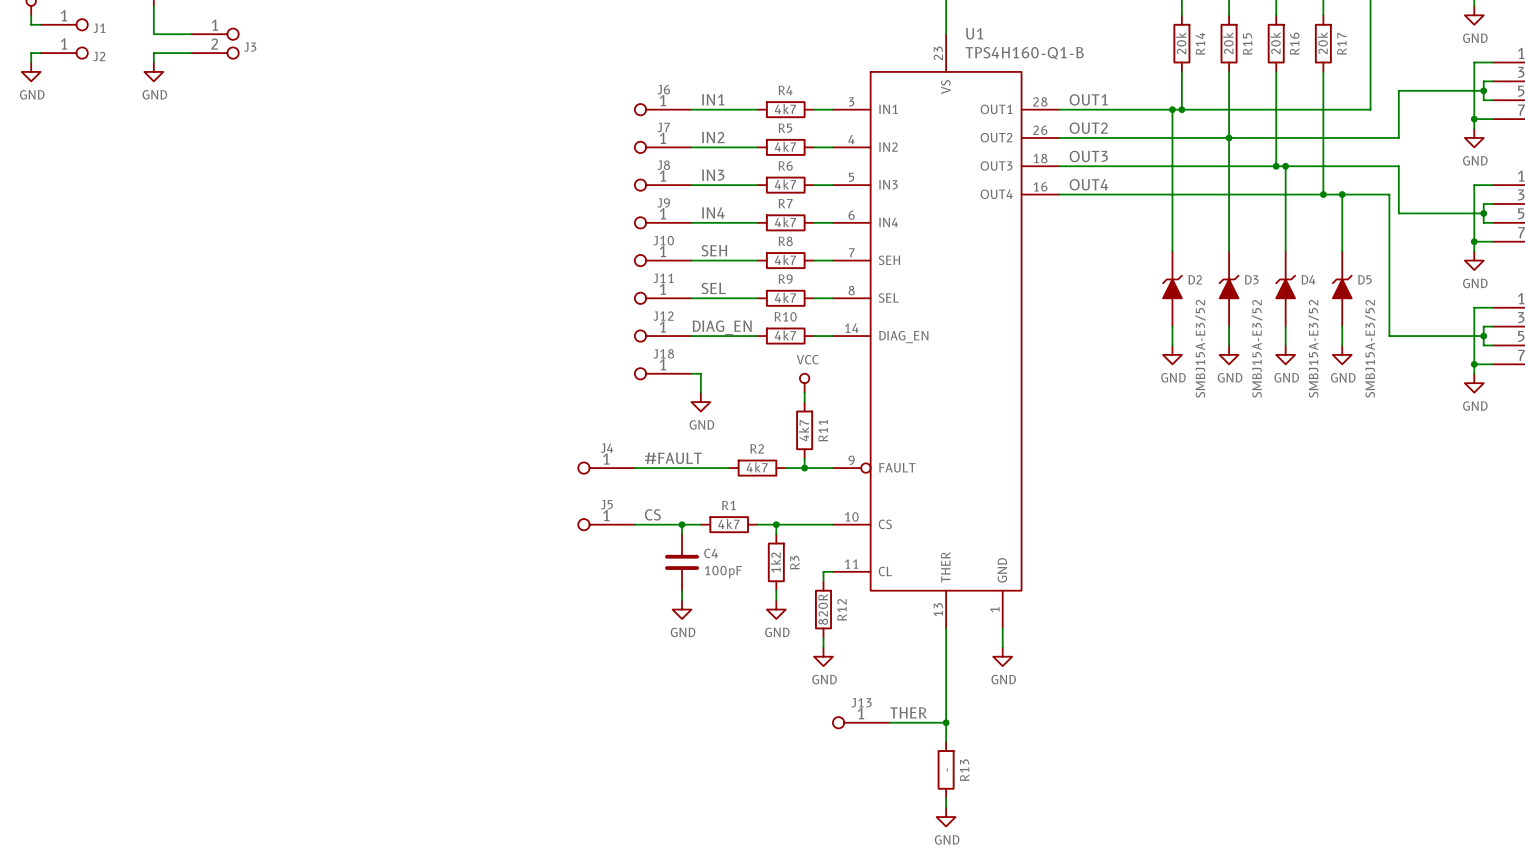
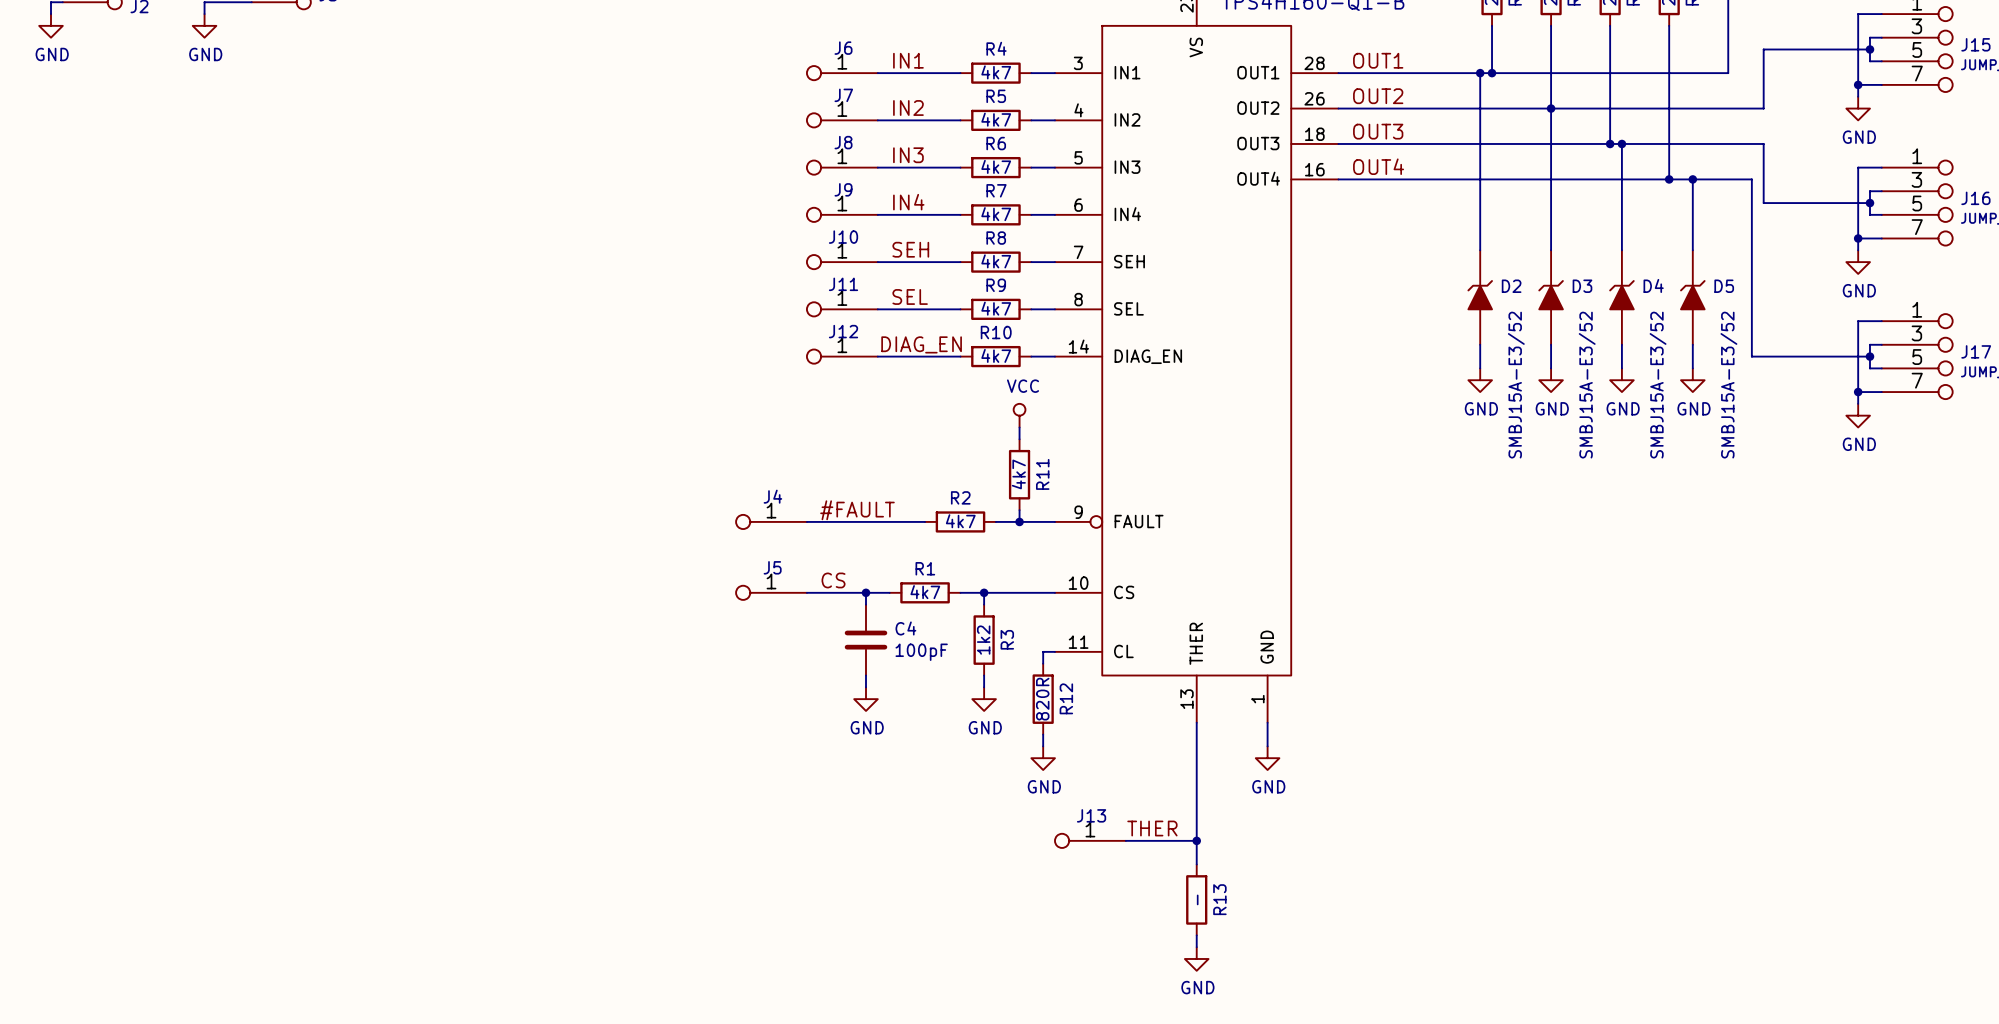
J18: (663, 373) -> none
wire: (691, 373) (700, 373) (700, 392) -> none
power symbol: GND (700, 402) -> none

